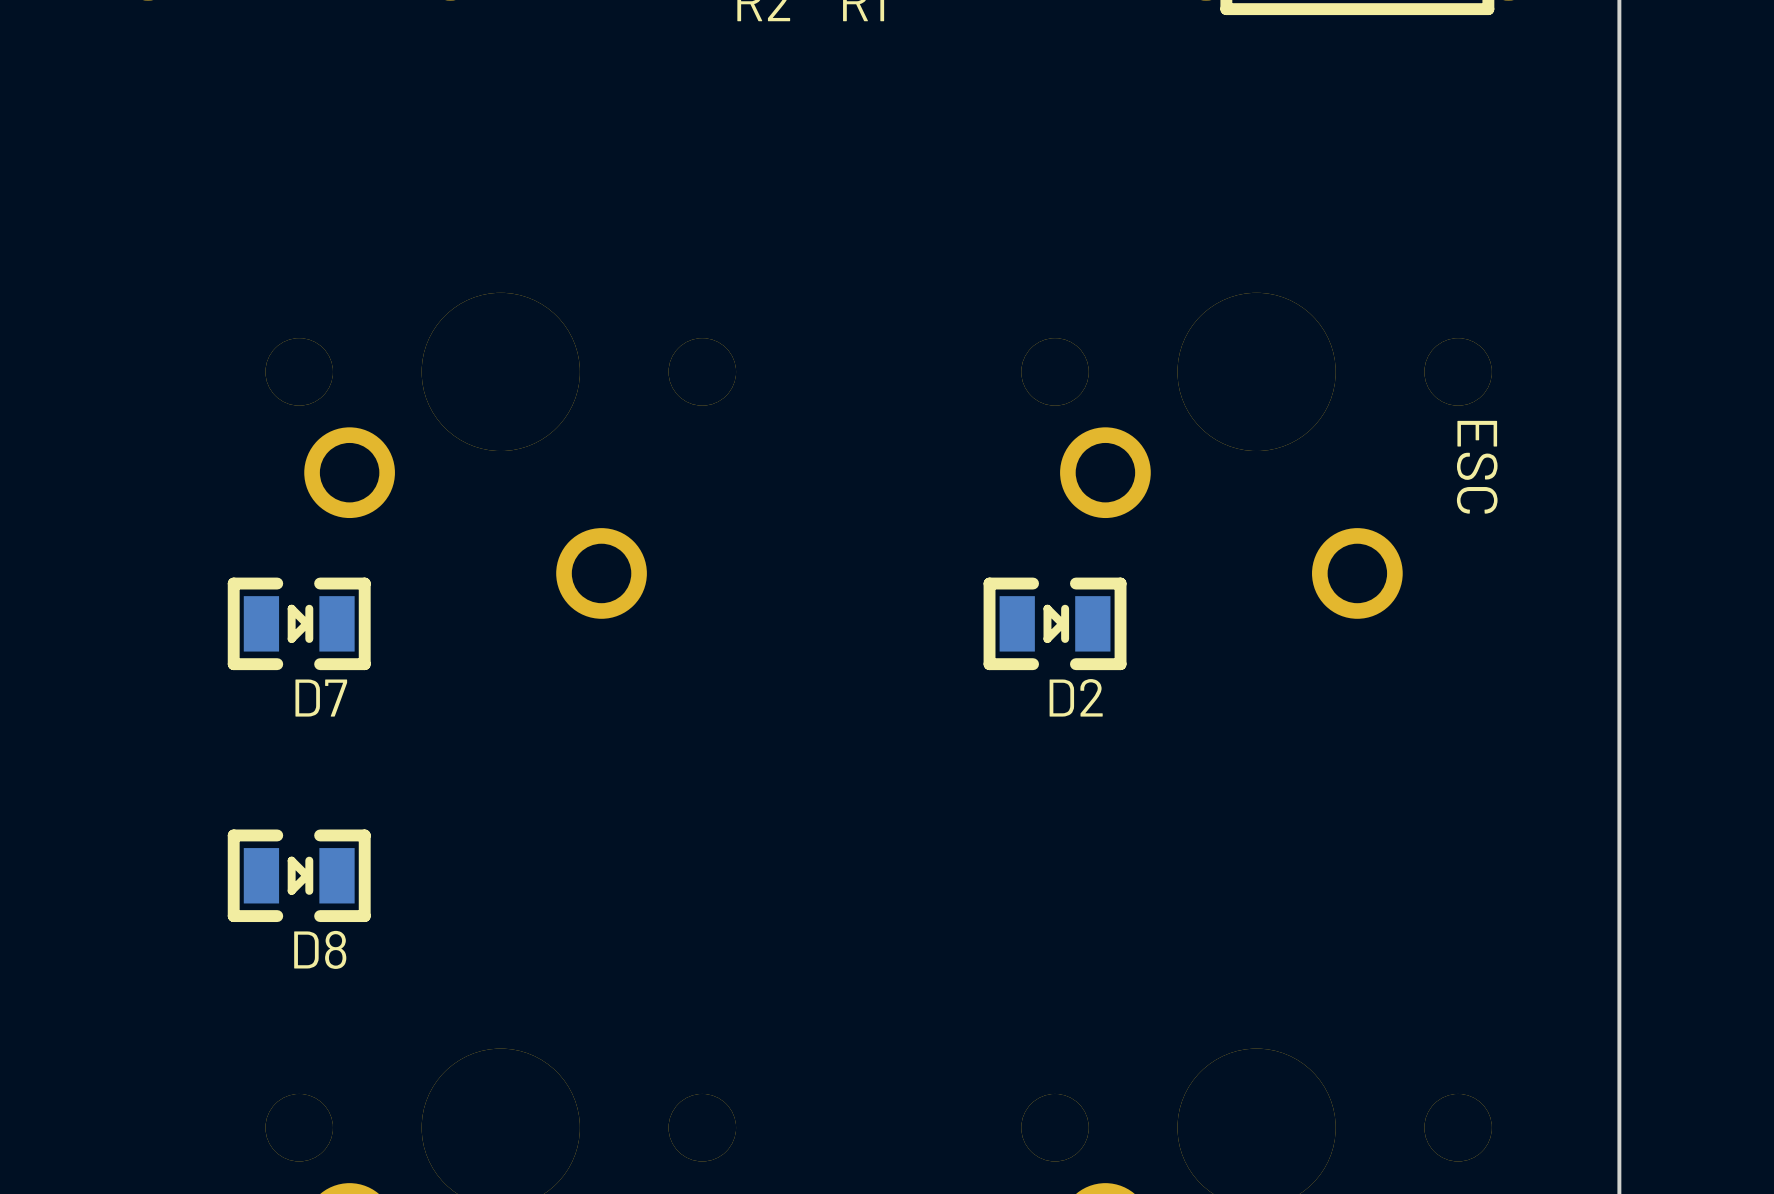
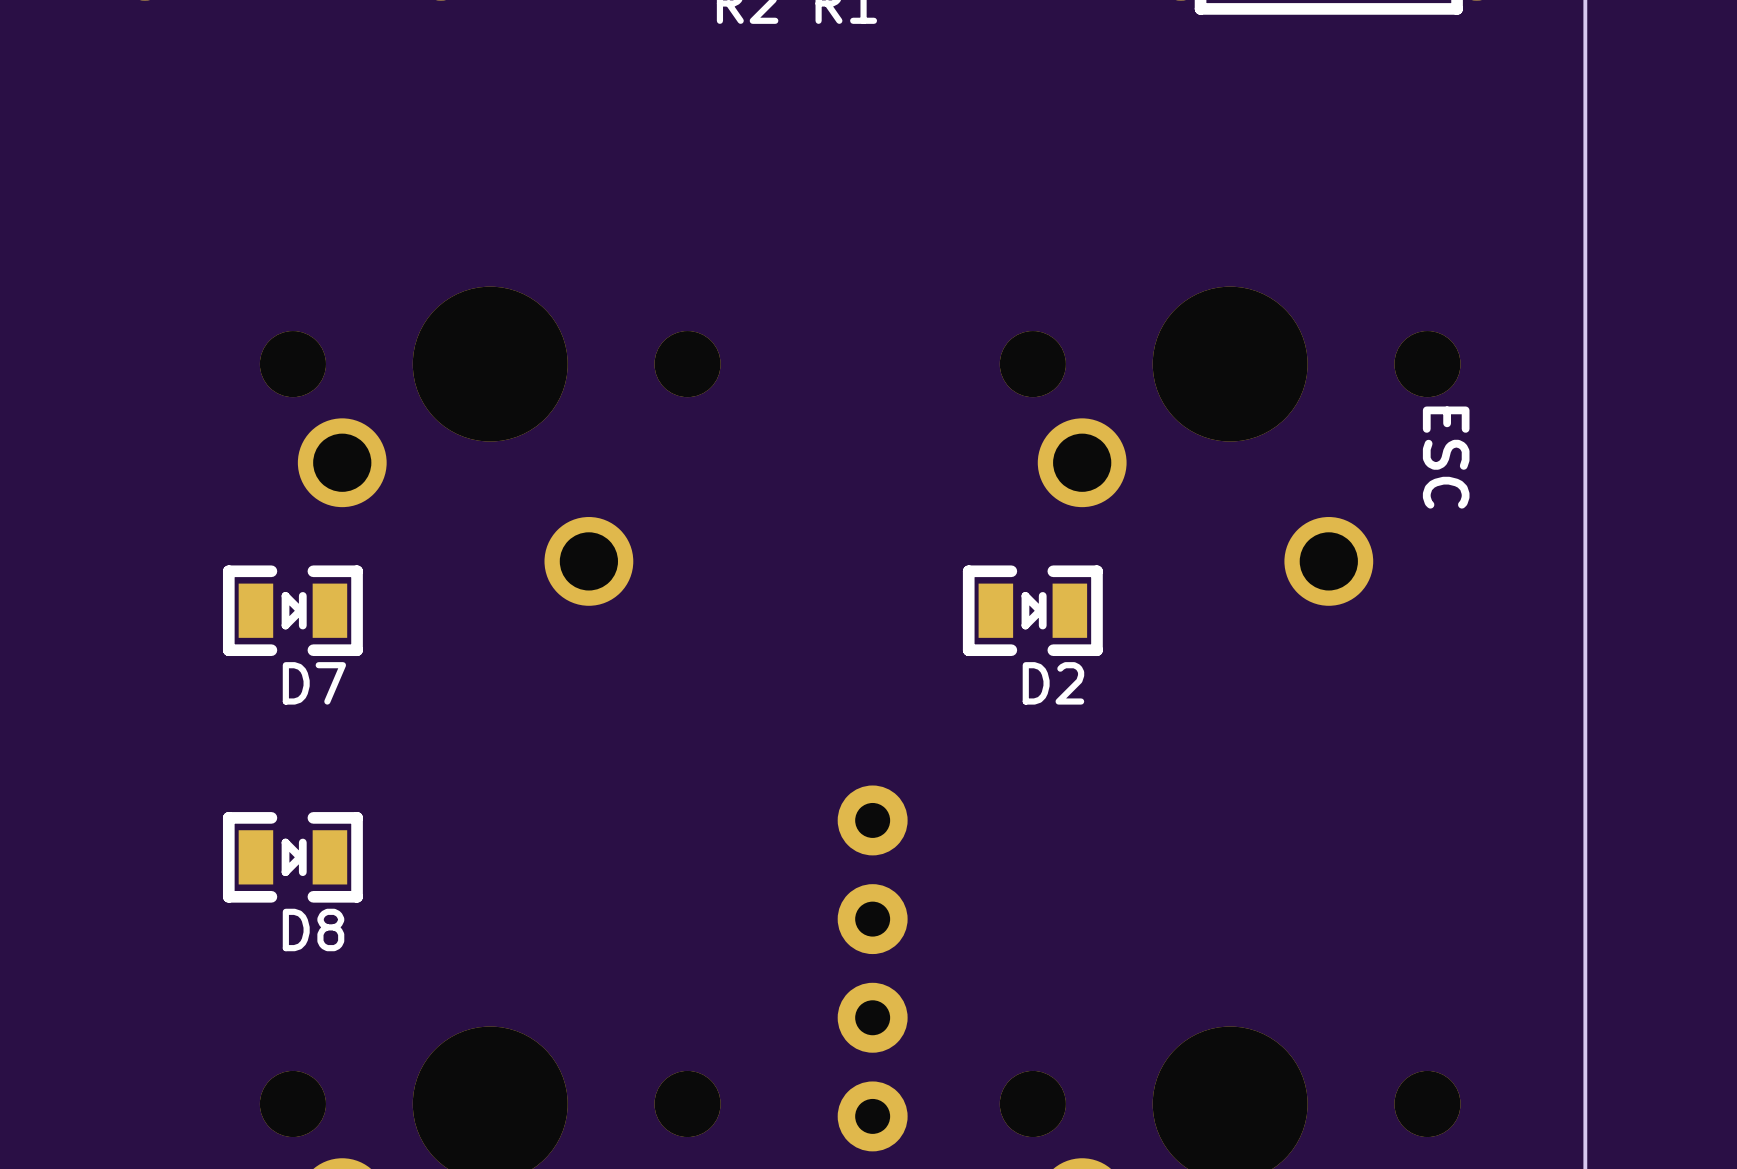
part: none -> (872, 820)
part: none -> (872, 919)
part: none -> (872, 1017)
part: none -> (872, 1116)

